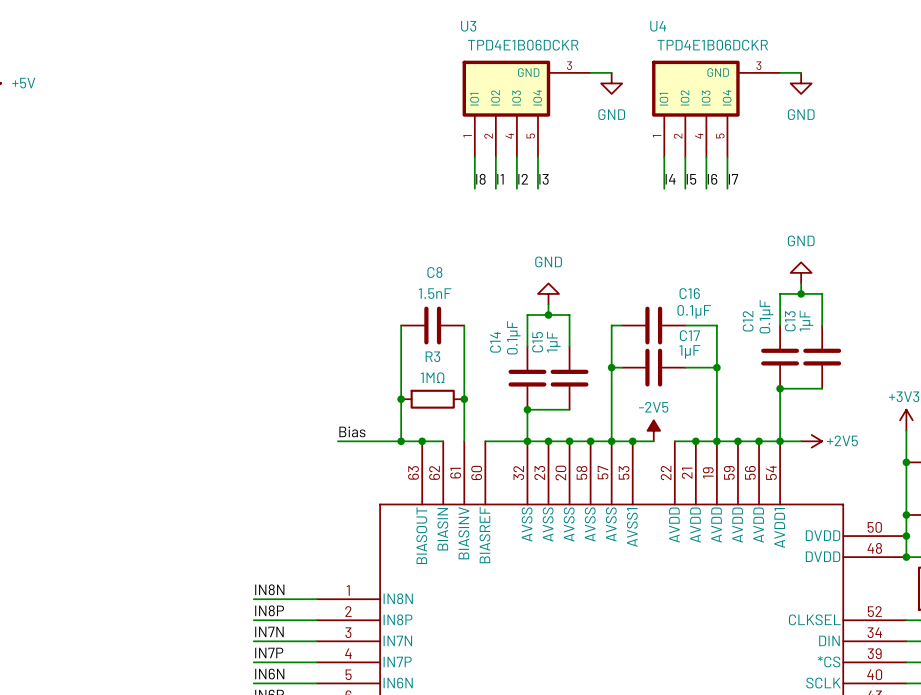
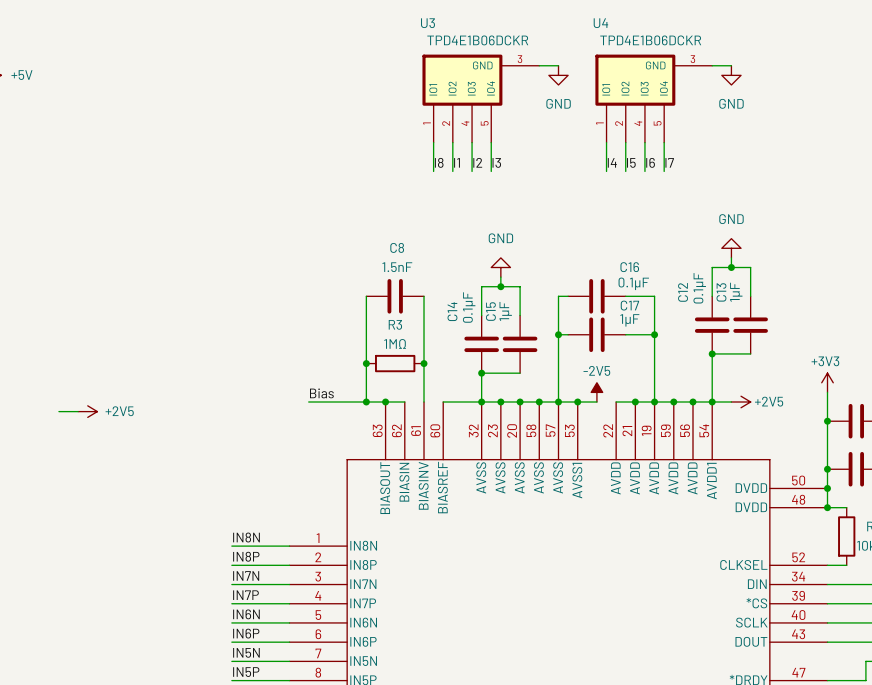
wire: none -> (58, 411) (78, 411)
power symbol: none -> +2V5 (87, 411)

